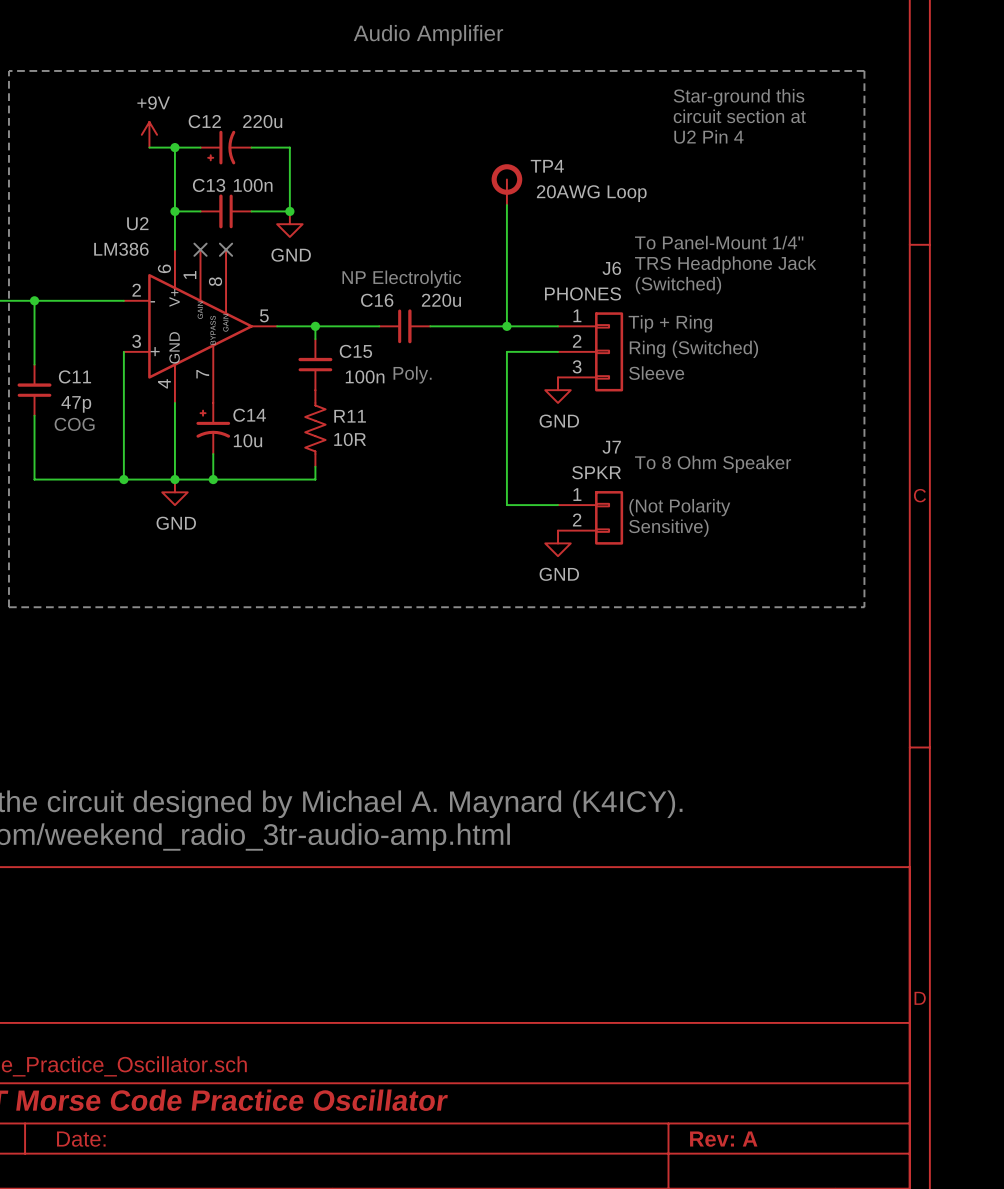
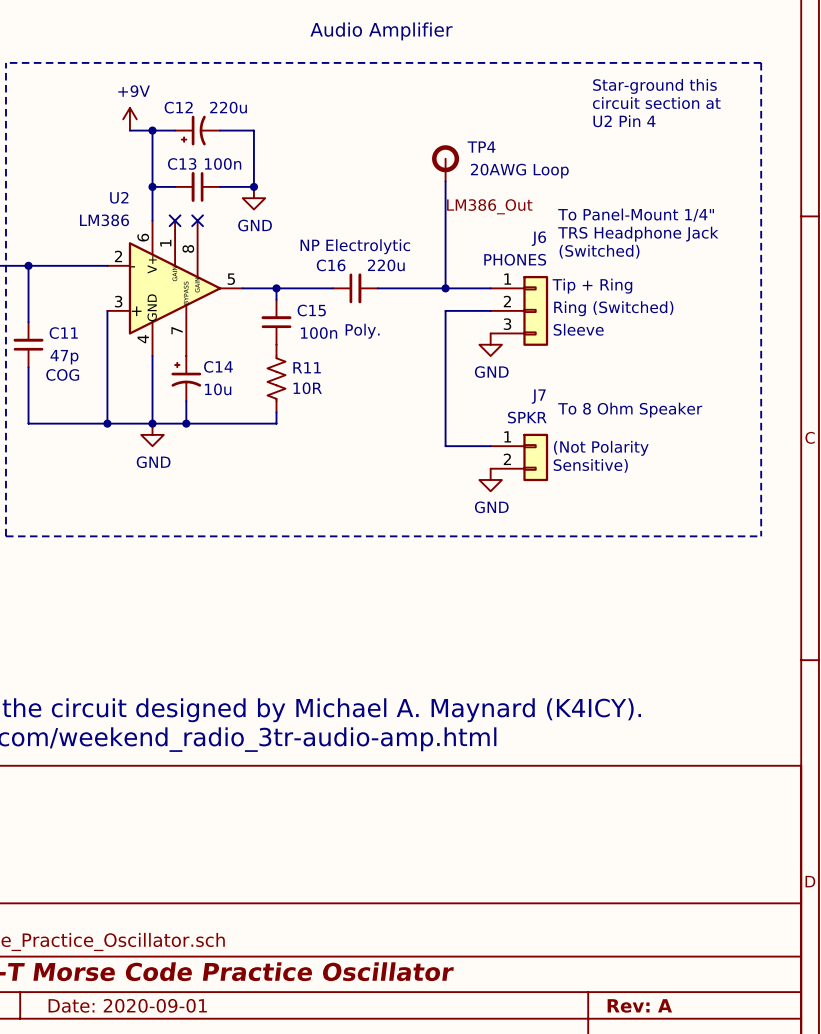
label: none -> LM386_Out (489, 206)
title block: Date: (81, 1139) -> Date: 2020-09-01 (127, 1005)

